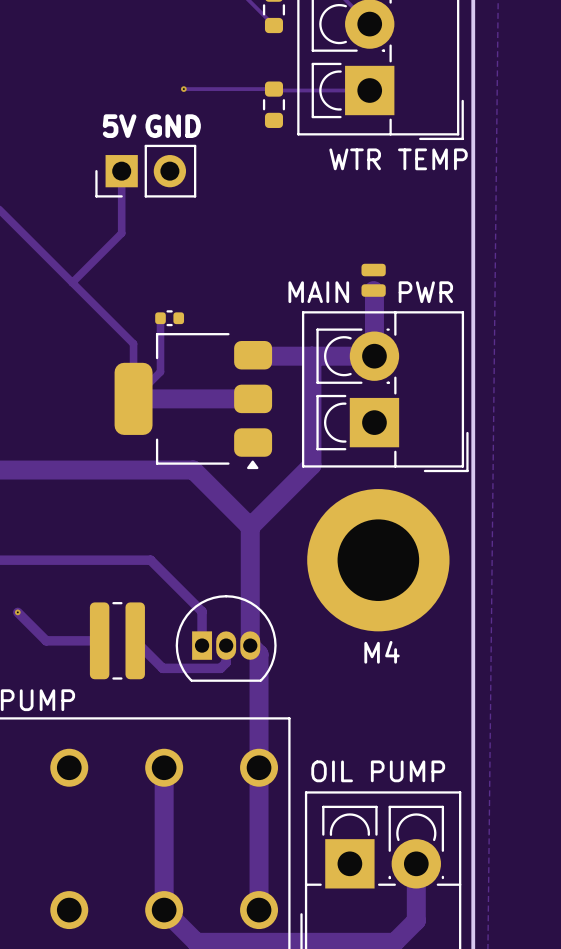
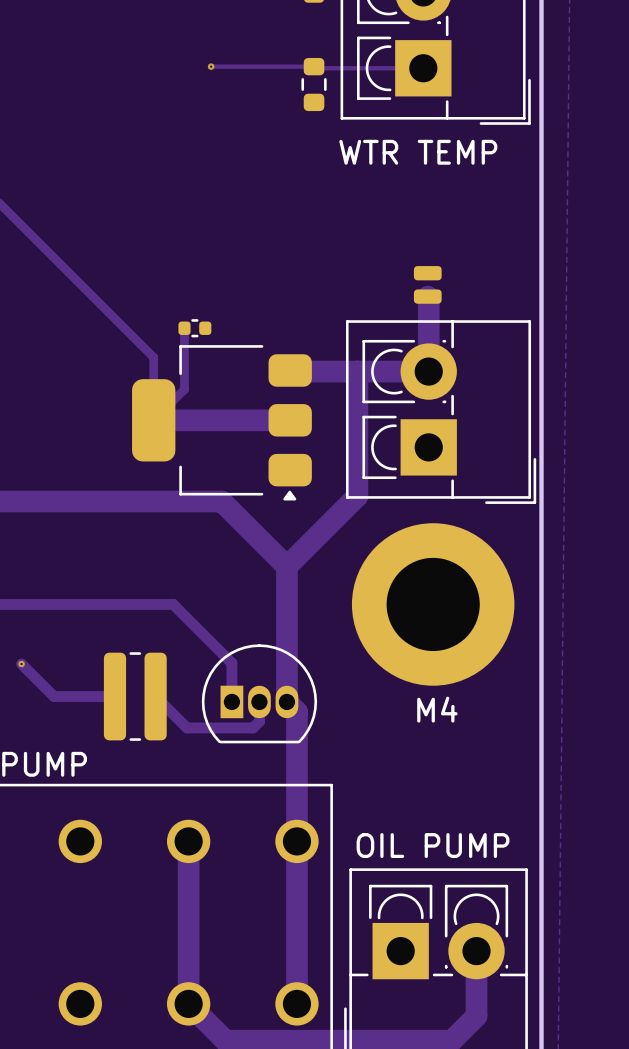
text: 5V (119, 126) -> none
text: GND (173, 126) -> none
text position: WTR TEMP (398, 159) -> WTR TEMP (418, 152)
track: (121, 171) (121, 233) (72, 282) -> none
part: (145, 171) -> none
text: MAIN PWR (370, 292) -> none

